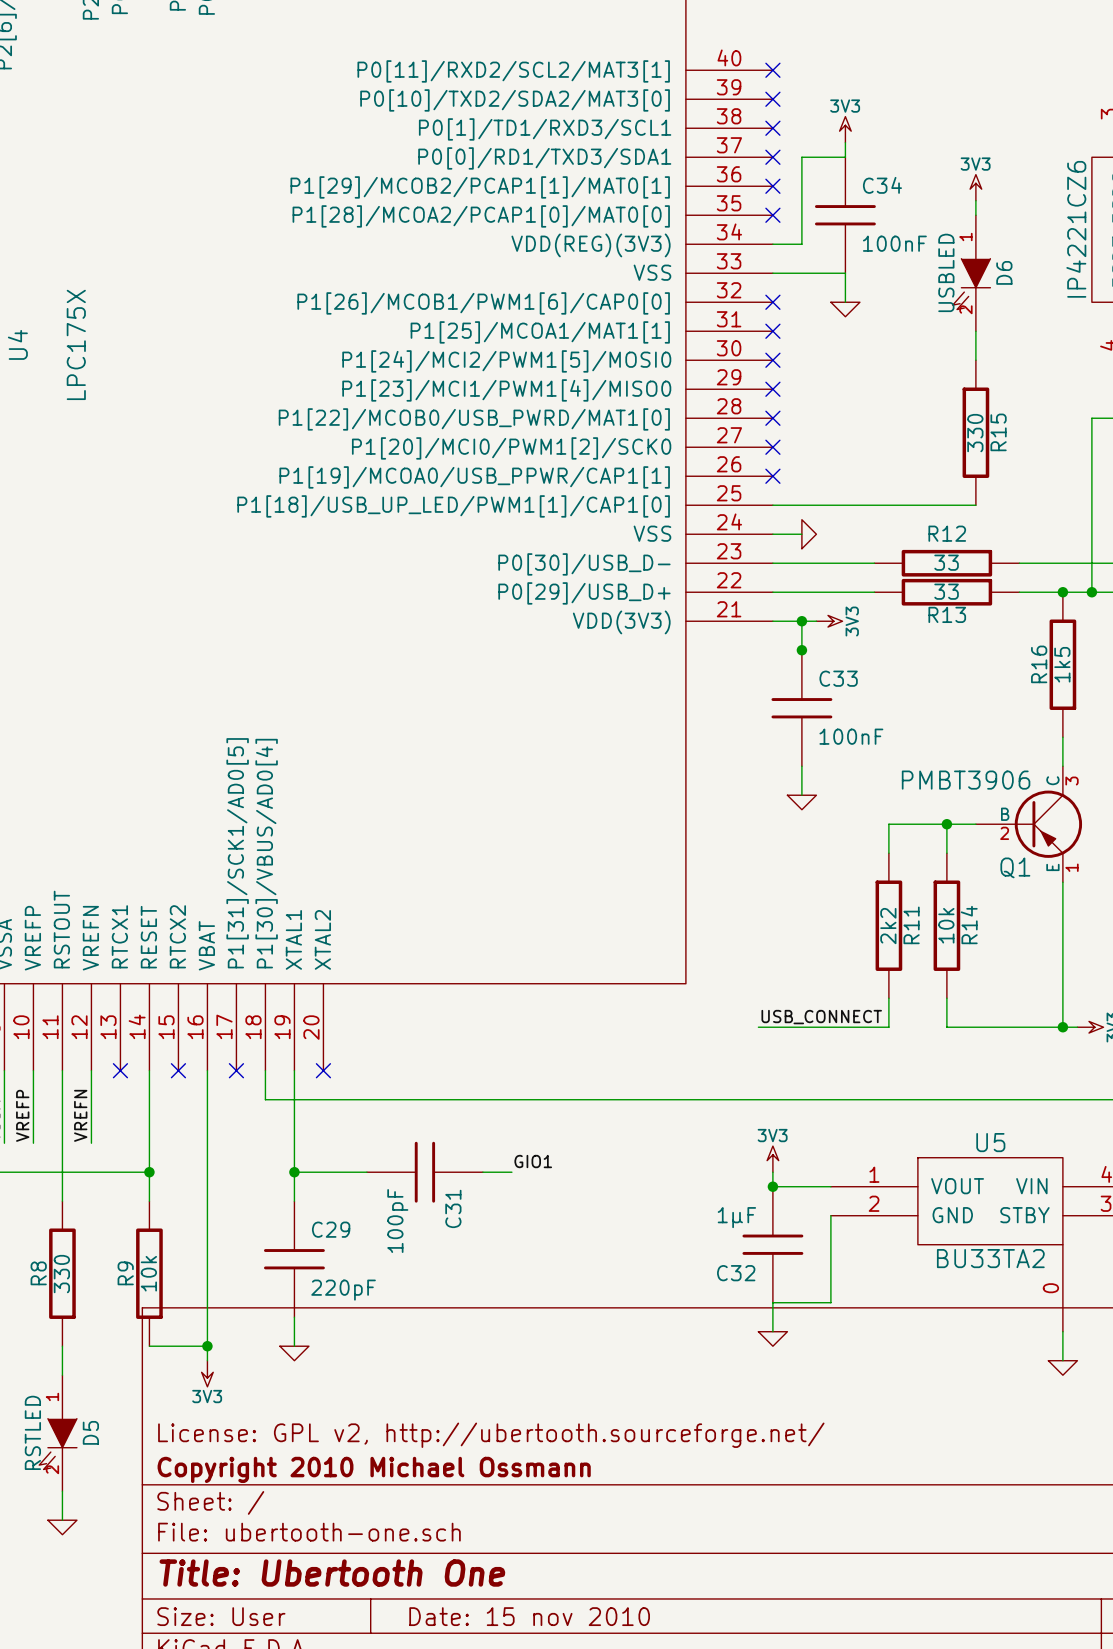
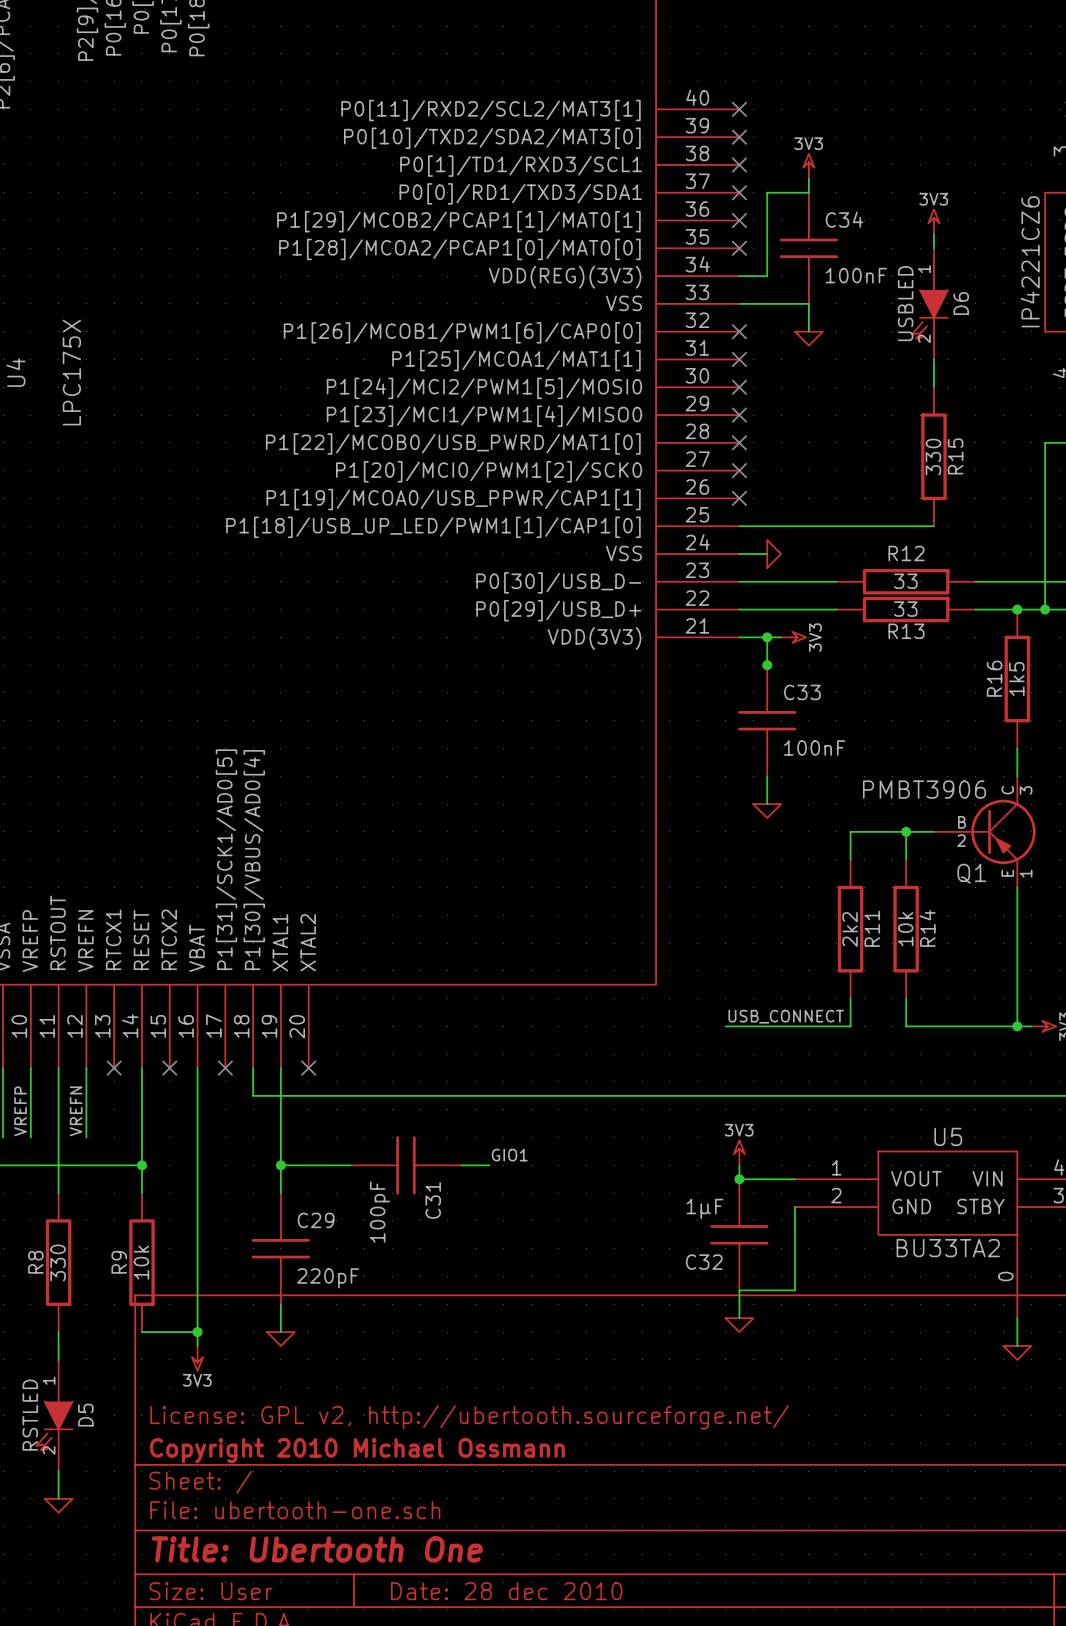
title block: Date: 15 nov 2010 (529, 1616) -> Date: 28 dec 2010 (506, 1591)

